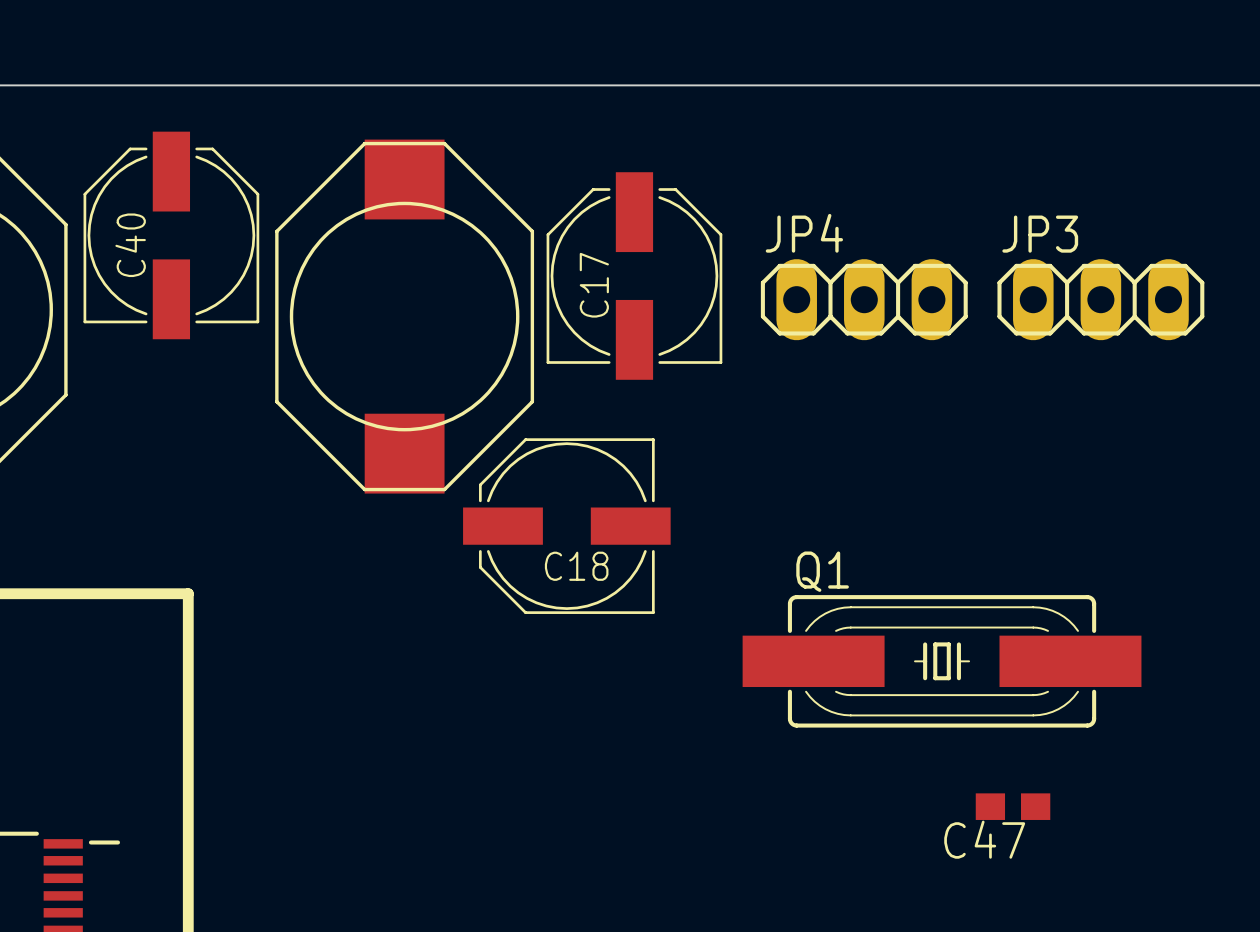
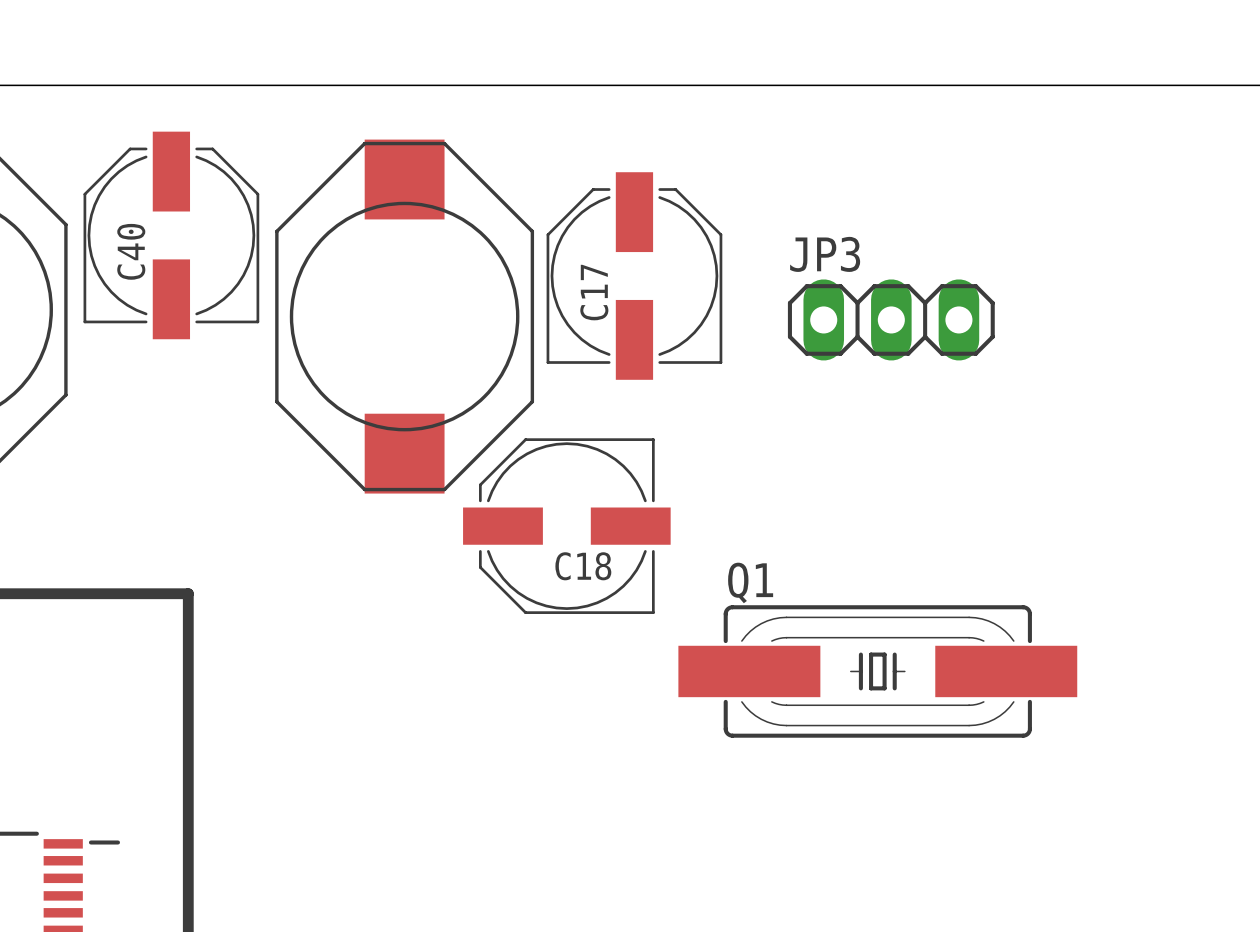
JP4: (864, 299) -> none
JP3 position: (1100, 299) -> (891, 319)
Q1 position: (942, 661) -> (877, 671)
C47: (1013, 806) -> none

